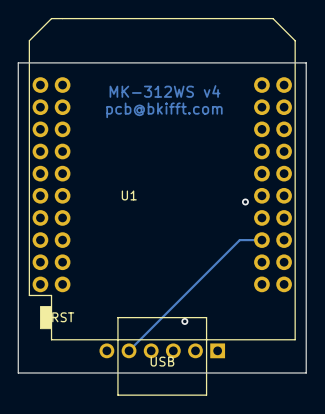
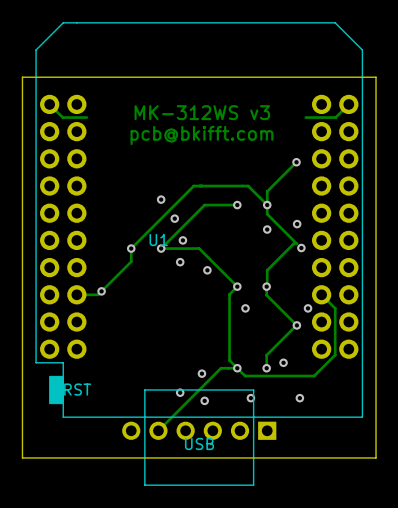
track: none -> (49, 104) (62, 117) (86, 117)
track: none -> (348, 104) (335, 117) (305, 117)
text: MK-312WS v4 (164, 91) -> MK-312WS v3 (202, 112)
track: none -> (296, 162) (267, 191) (267, 214) (296, 243) (293, 243) (267, 270) (266, 295) (296, 325) (266, 355) (266, 368)
via: none -> (296, 162)
via: none -> (161, 199)
track: none -> (237, 205) (204, 205) (161, 248) (199, 248) (237, 286) (229, 294) (229, 360) (245, 375) (314, 375) (335, 355) (335, 308) (321, 294)
via: none -> (237, 205)
track: none -> (267, 205) (248, 186) (193, 186) (131, 248) (131, 261) (98, 294) (76, 294)
via: none -> (267, 205)
via: none -> (174, 218)
via: none -> (297, 224)
via: none -> (267, 229)
via: none -> (182, 240)
via: none -> (131, 248)
via: none -> (161, 248)
via: none -> (180, 262)
via: none -> (207, 270)
via: none -> (237, 286)
via: none -> (266, 286)
via: none -> (101, 291)
track: (261, 240) (239, 240) (179, 299) -> (237, 368) (220, 368)
via: none -> (245, 308)
via: none -> (308, 308)
via: none -> (296, 325)
via: none -> (283, 362)
via: none -> (237, 368)
via: none -> (266, 368)
via: none -> (201, 373)
via: none -> (180, 392)
via: (184, 321) -> none
via: none -> (250, 398)
via: none -> (299, 398)
via: none -> (204, 400)

